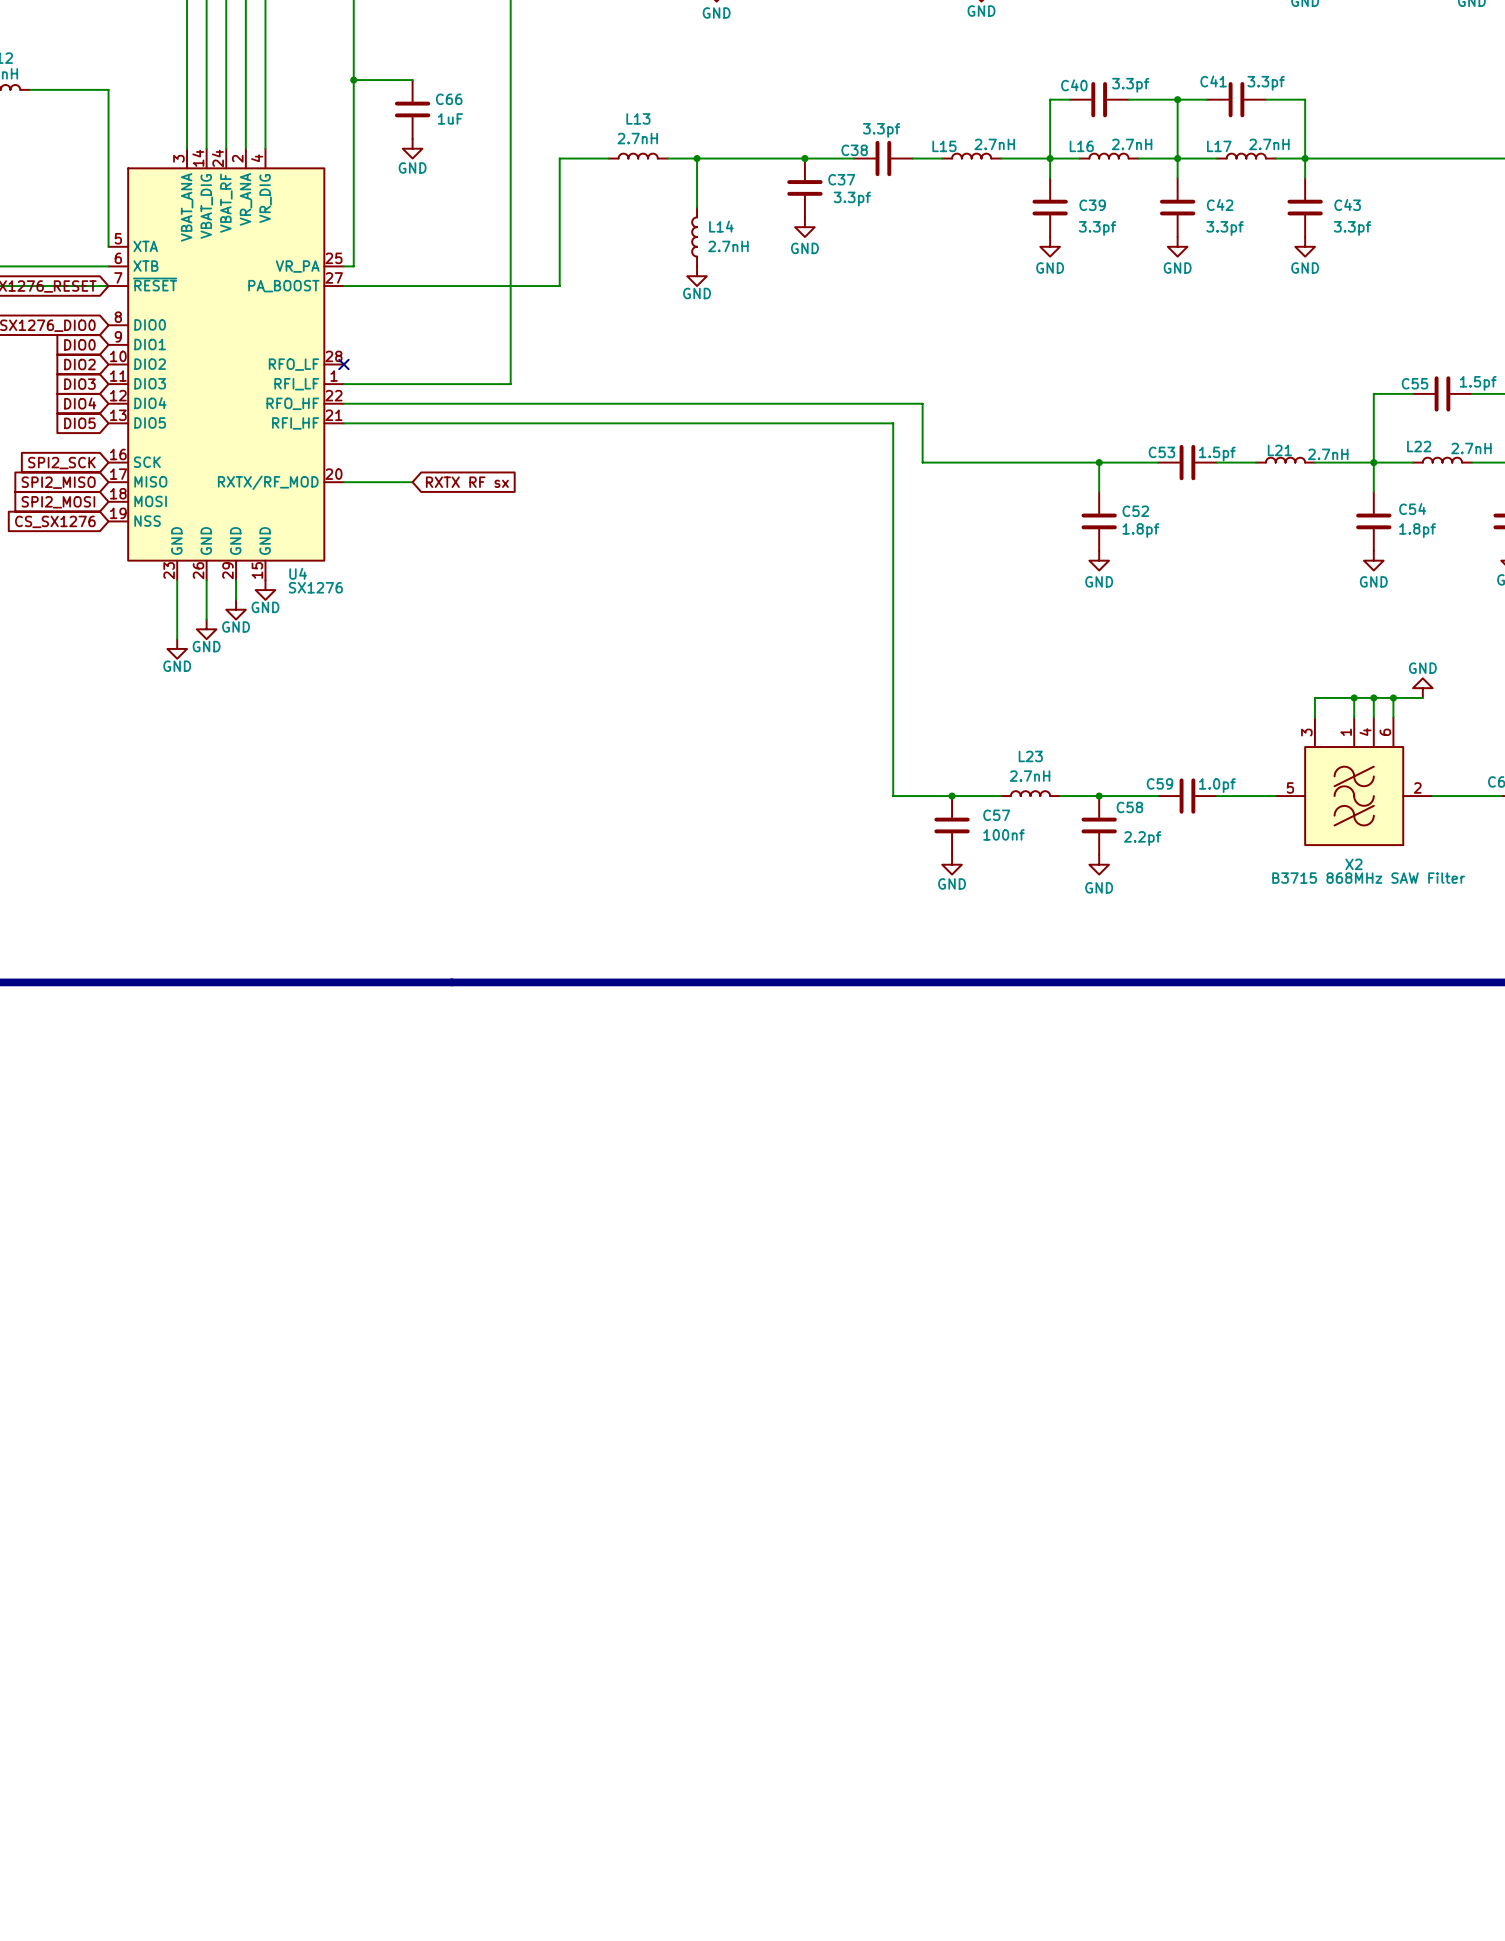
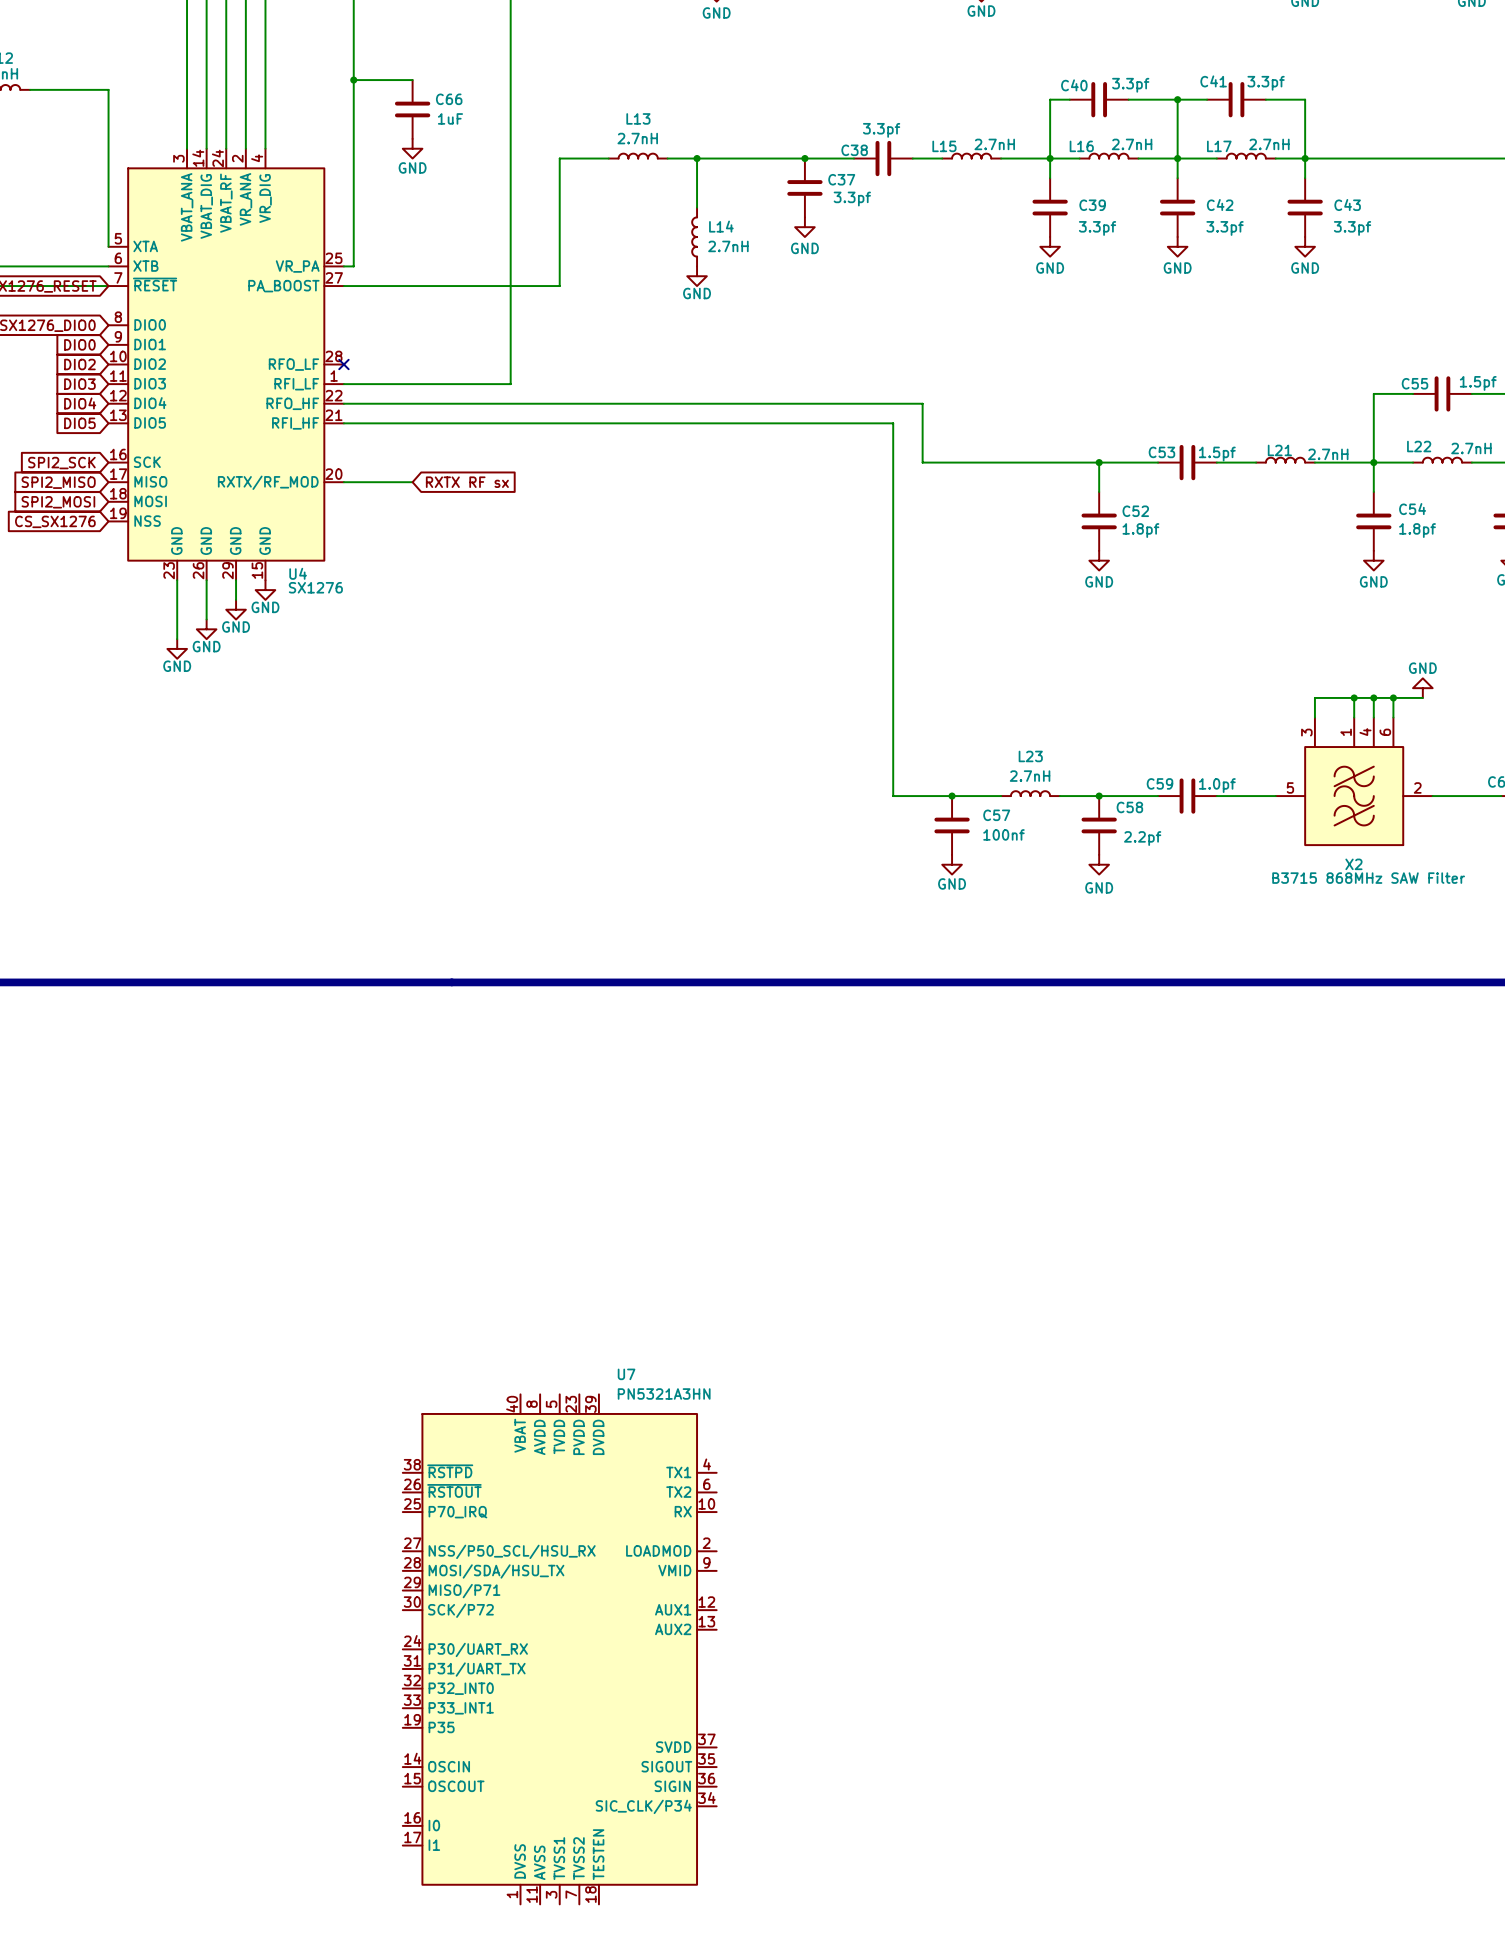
U7: none -> PN5321A3HN (559, 1649)

